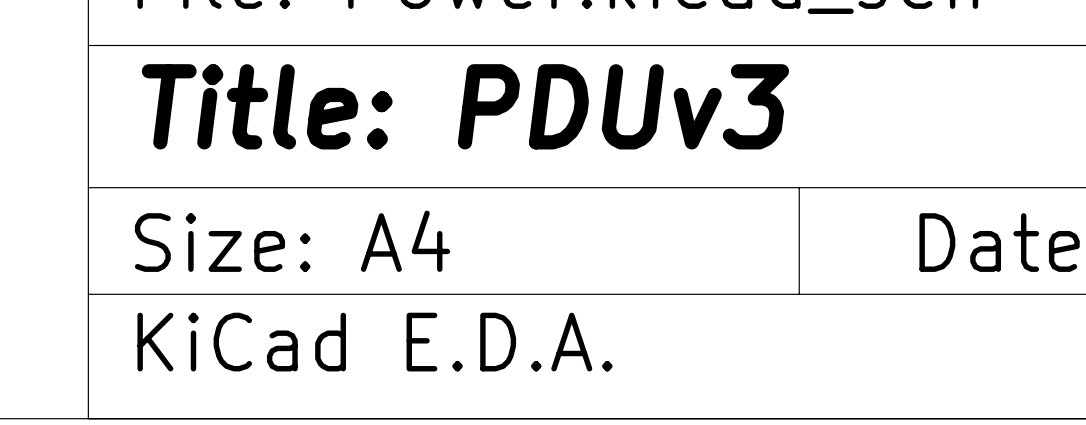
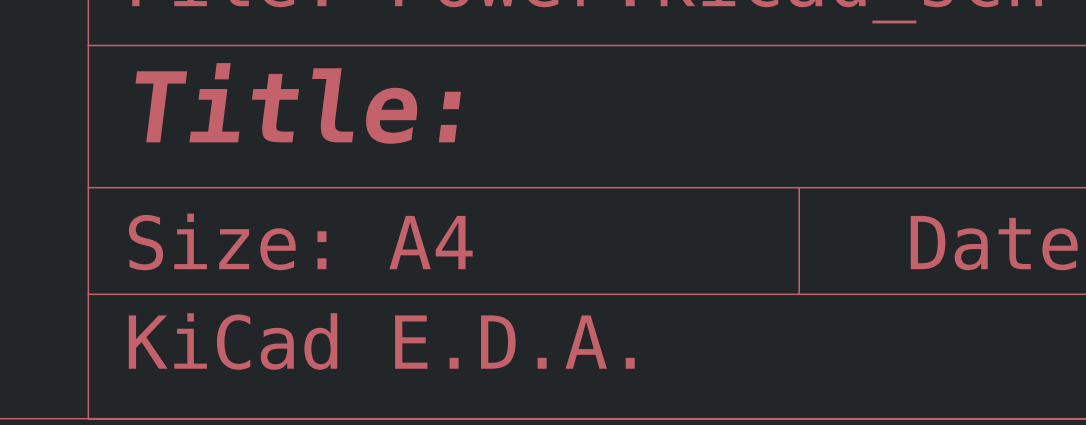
title block: Title: PDUv3 (465, 106) -> Title: (298, 103)

